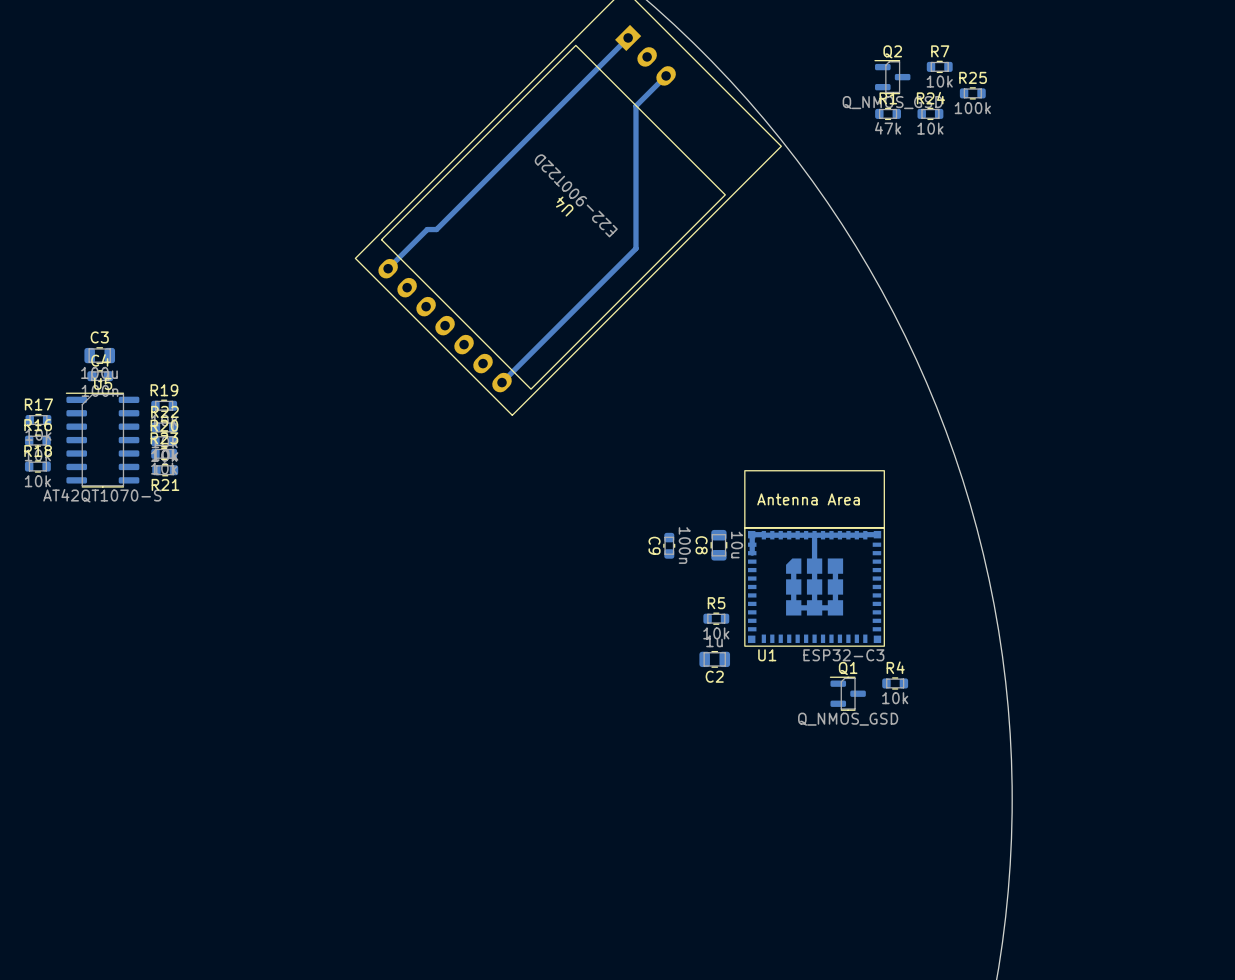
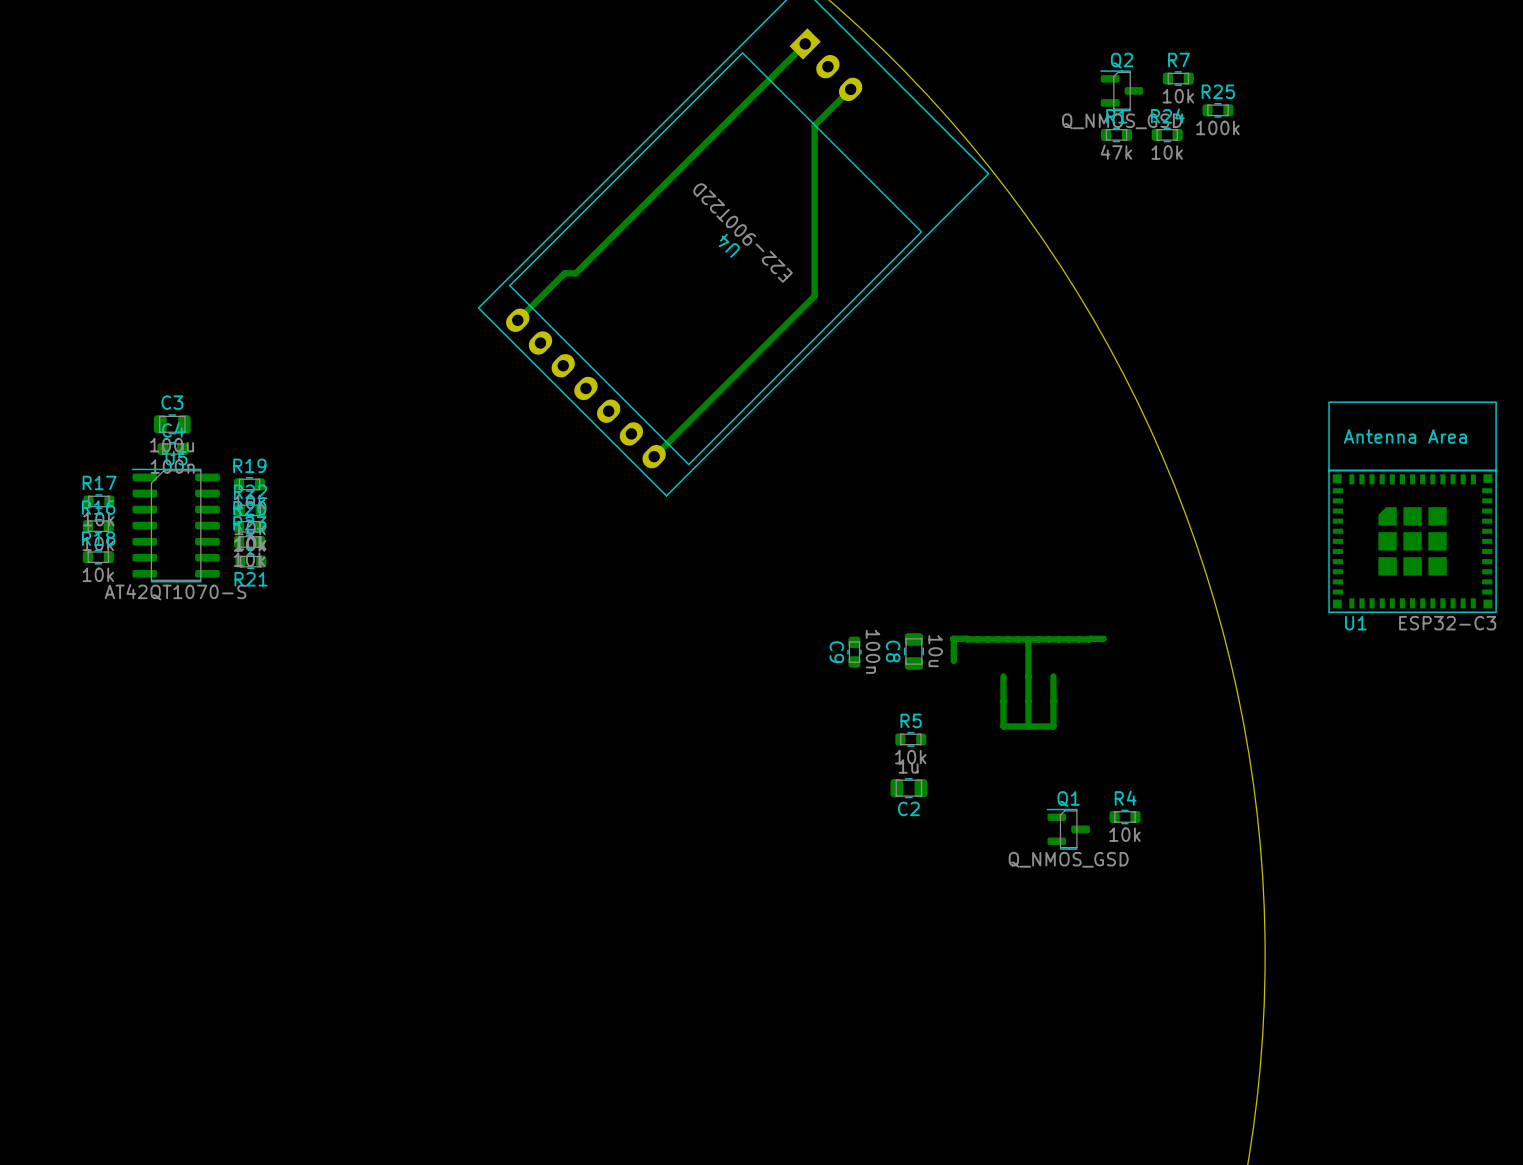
U1 position: (814, 558) -> (1412, 507)

